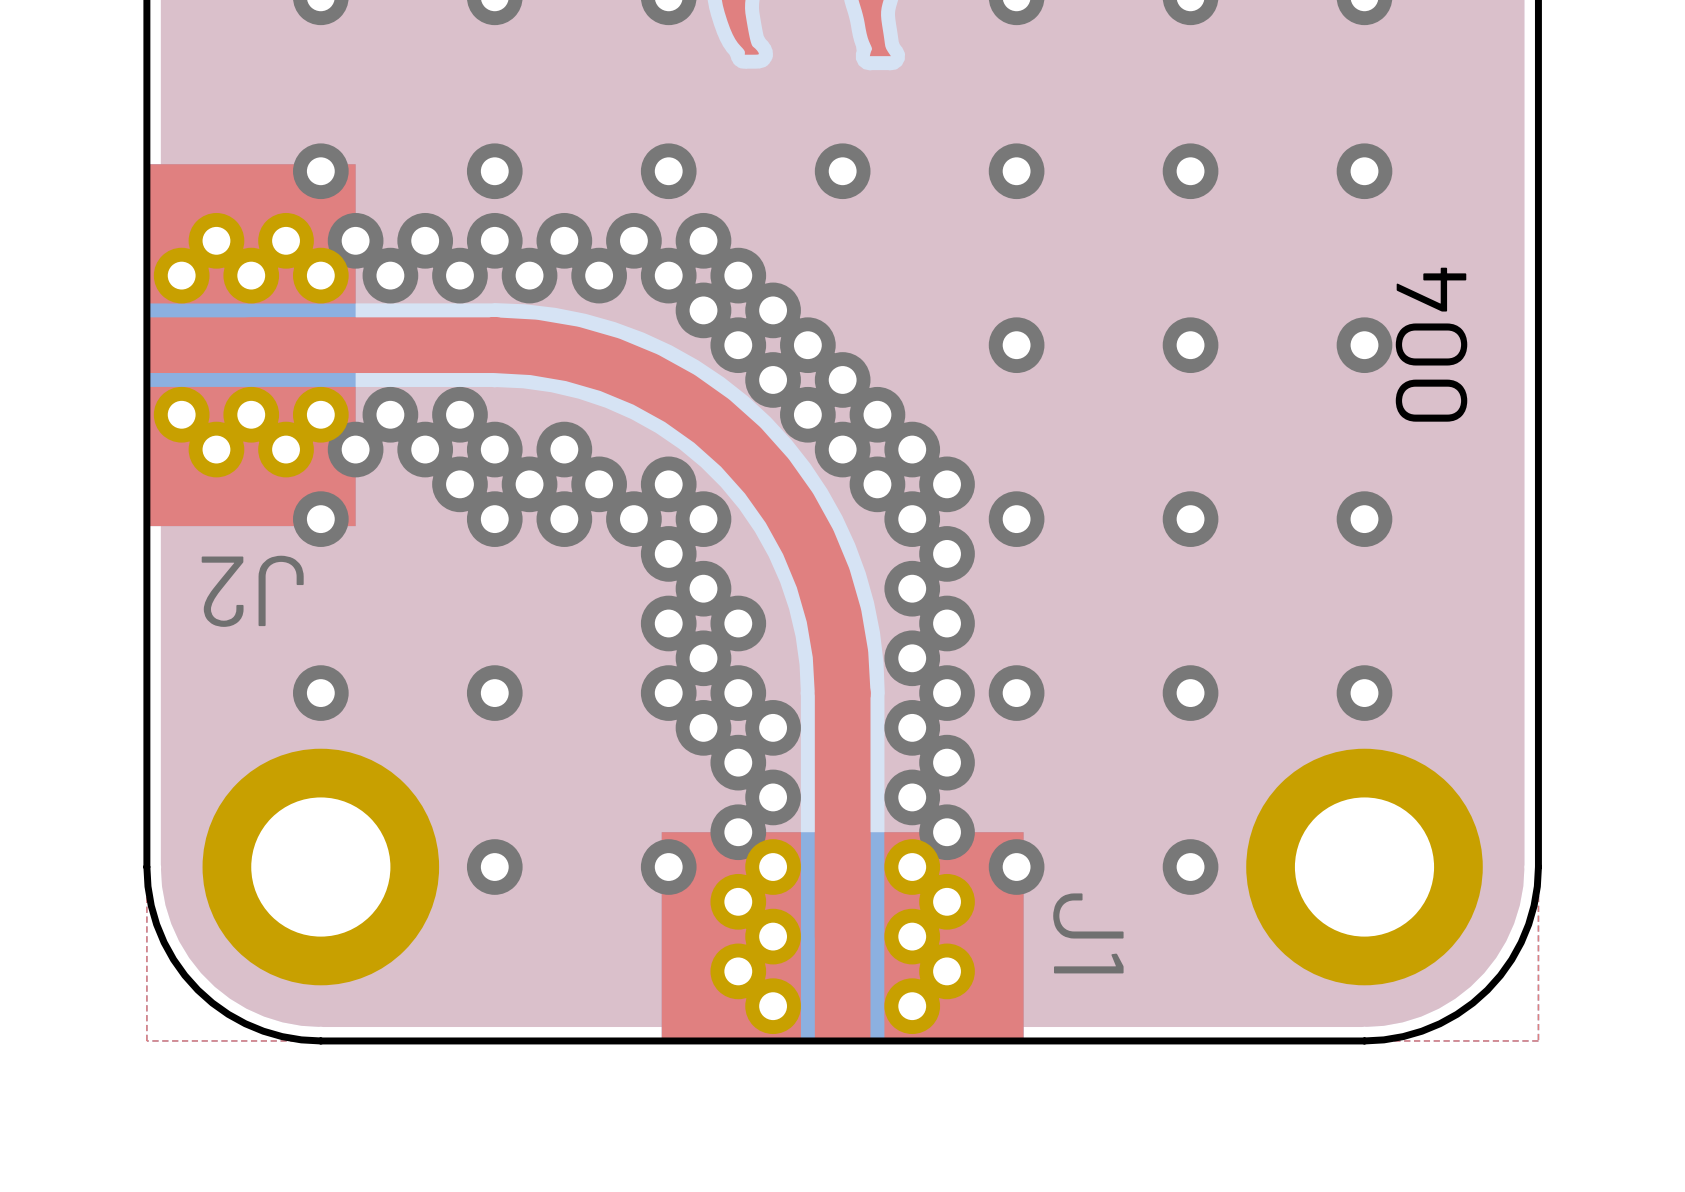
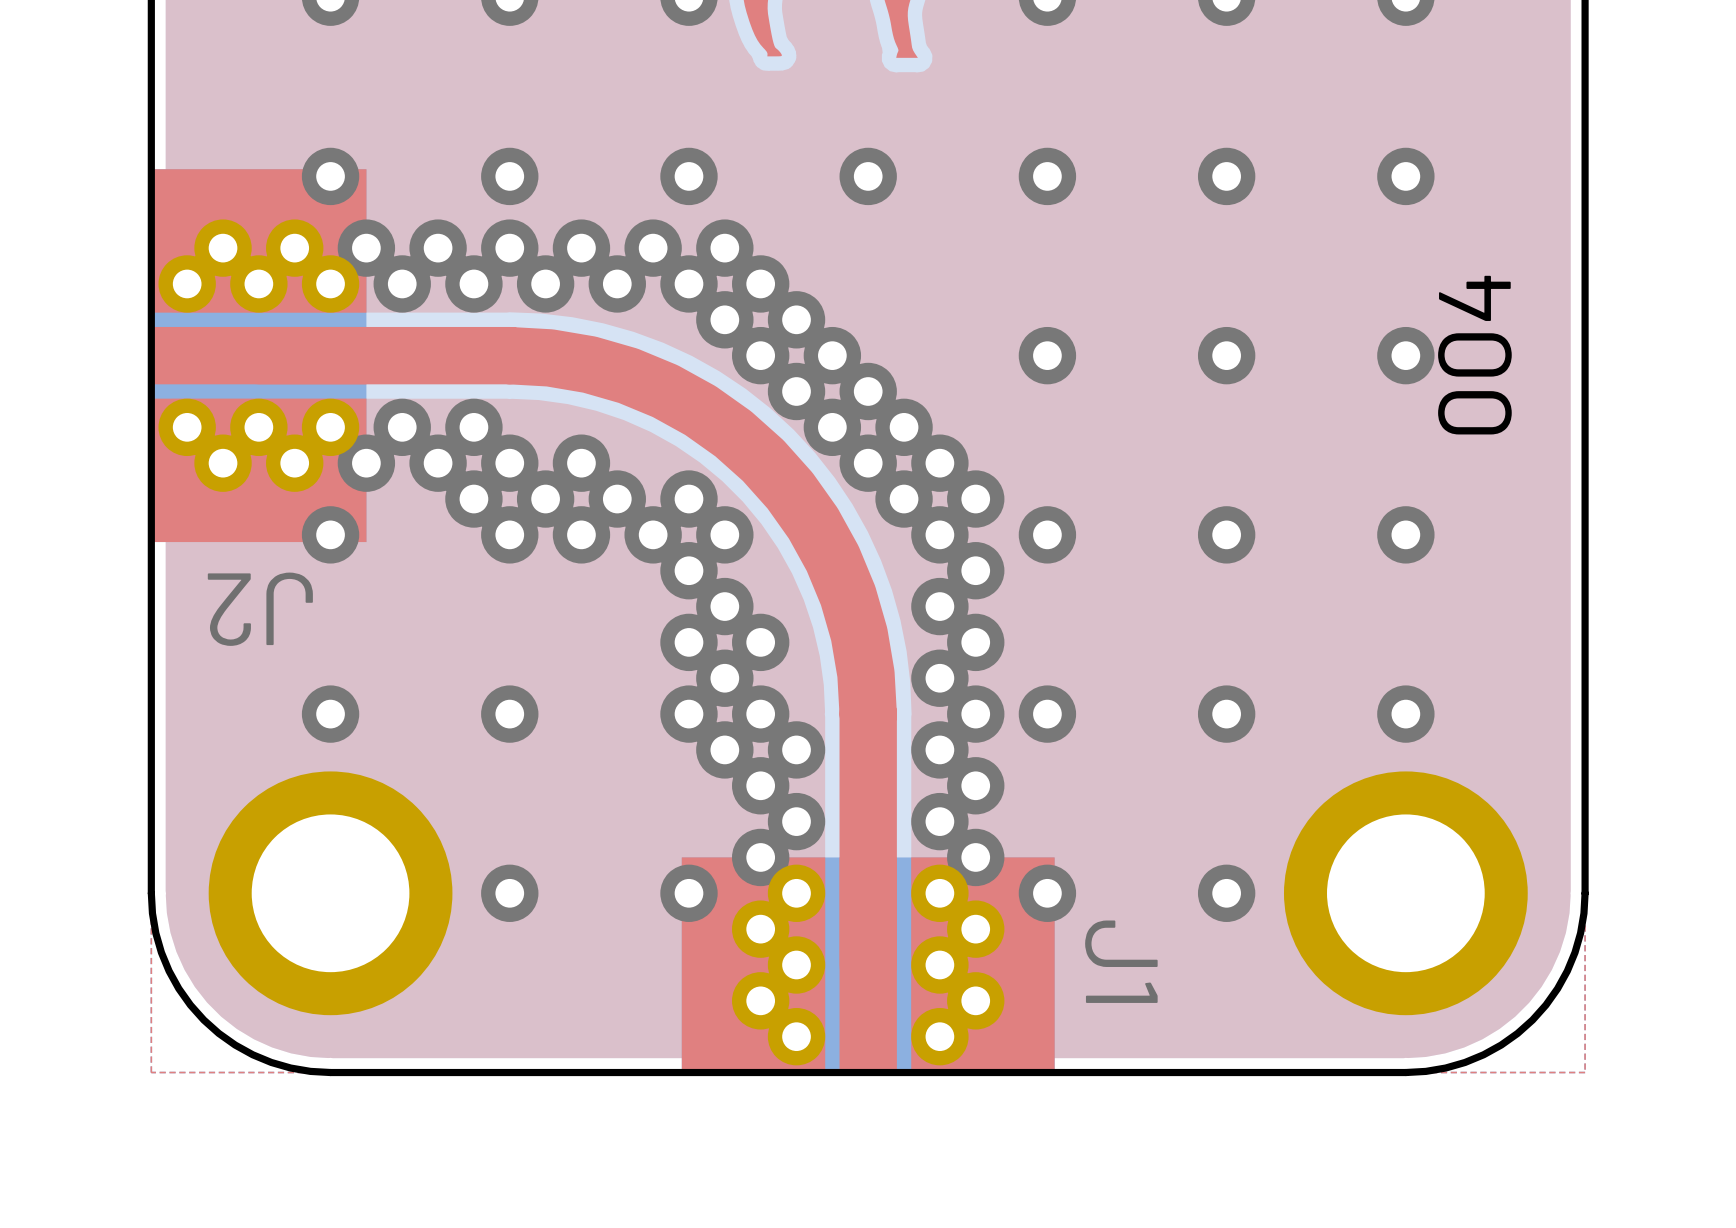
part footprint: [202, 748, 440, 986] -> [208, 771, 453, 1016]
part footprint: [1246, 748, 1483, 986] -> [1283, 771, 1528, 1016]

